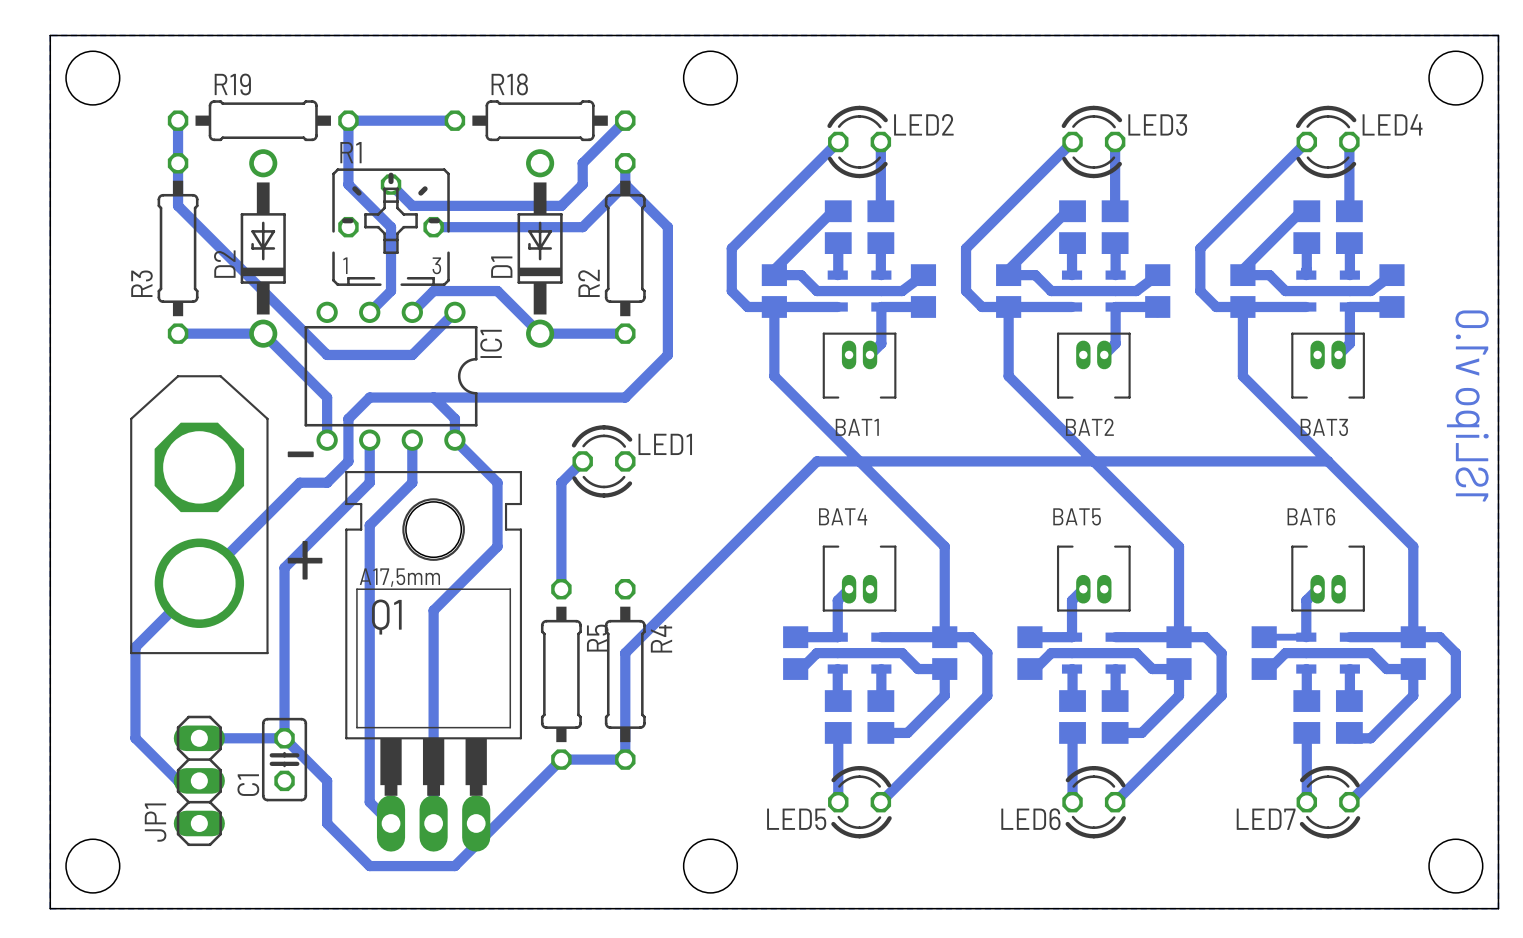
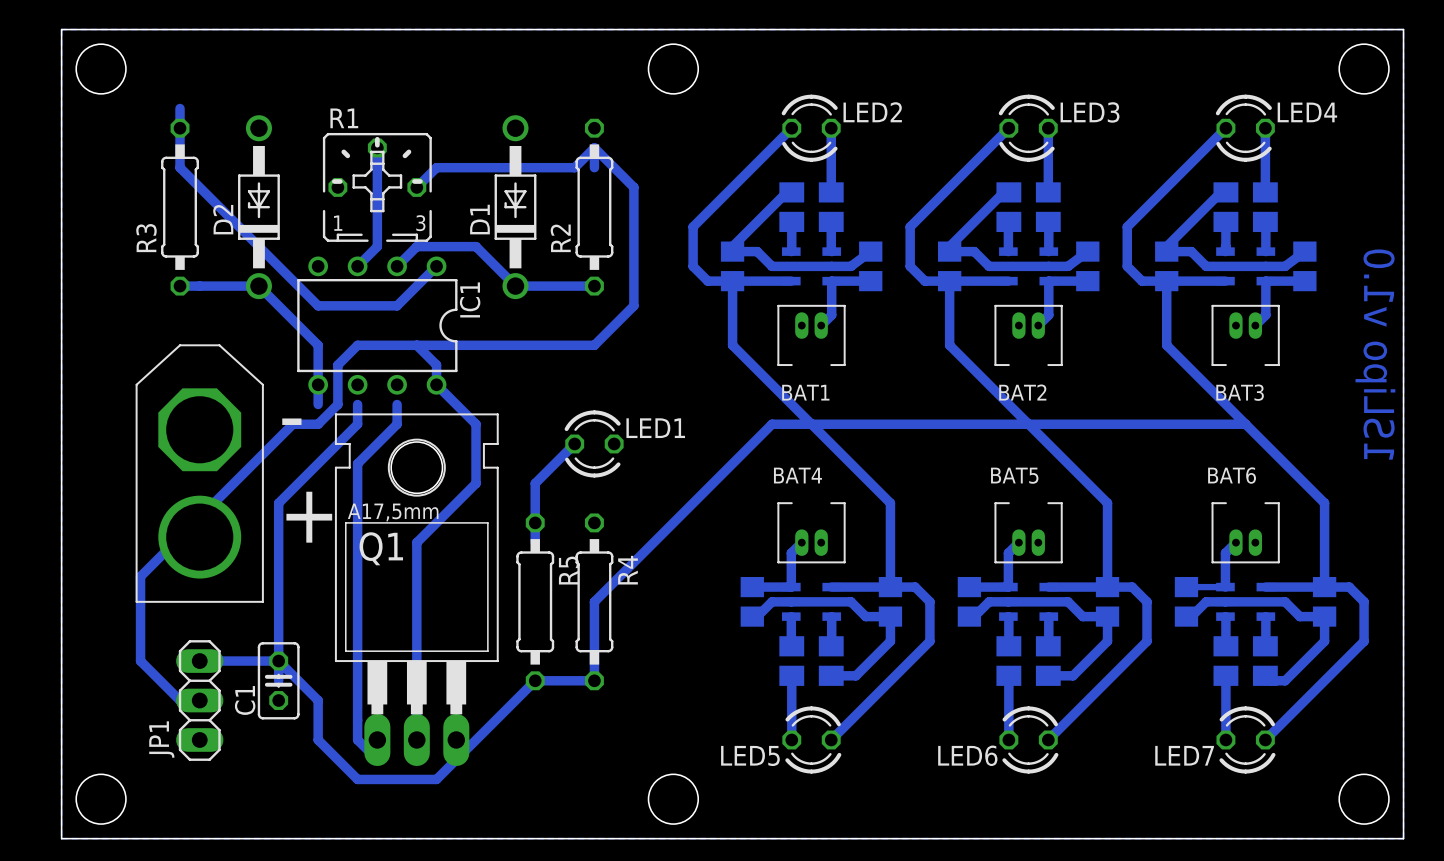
R19: (263, 120) -> none
bottom track: (454, 120) (348, 120) (348, 184) (391, 227) -> (377, 147) (377, 207)
R18: (540, 120) -> none
bottom track: (625, 120) (582, 163) (582, 184) (561, 205) (412, 205) (391, 184) -> none
bottom track: (178, 184) (178, 205) (327, 354) (412, 354) (454, 312) -> (180, 167) (318, 305) (397, 305) (436, 266)
R1 position: (391, 227) -> (377, 187)
bottom track: (433, 227) (582, 227) (625, 184) (667, 227) -> (416, 187) (436, 167) (574, 167) (594, 147) (633, 187) (633, 207)
R3 position: (178, 248) -> (180, 207)
D2 position: (263, 248) -> (258, 207)
D1 position: (540, 248) -> (515, 207)
R2 position: (625, 248) -> (594, 207)
bottom track: (391, 269) (391, 291) (369, 312) -> (377, 246) (357, 266)
bottom track: (412, 312) (433, 291) (497, 291) (540, 333) (625, 333) -> (397, 266) (416, 246) (476, 246) (515, 286) (594, 286)
bottom track: (178, 333) (263, 333) (327, 397) -> (180, 286) (258, 286) (318, 345) (318, 365)
bottom track: (667, 333) (667, 354) (625, 397) (369, 397) (348, 418) -> (633, 305) (594, 345) (357, 345) (337, 365) (337, 384)
IC1 position: (391, 376) -> (377, 325)
bottom track: (433, 397) (454, 418) (454, 440) (497, 482) -> (416, 345) (436, 365) (436, 384) (476, 424) (476, 443)
bottom track: (348, 440) (348, 461) (327, 482) (299, 482) (135, 647) -> (337, 404) (318, 424) (292, 424) (140, 576) (140, 596)
bottom track: (369, 461) (369, 482) (284, 567) -> (357, 424) (278, 503) (278, 522)
bottom track: (412, 461) (412, 482) (369, 525) -> (397, 424) (357, 463) (357, 483)
bottom track: (582, 461) (561, 482) (561, 525) -> (574, 443) (535, 483)
LED1 position: (603, 461) -> (594, 443)
bottom track: (497, 525) (497, 546) (433, 610) -> (476, 483) (416, 542) (416, 562)
Q1 position: (433, 661) -> (416, 589)
R5 position: (561, 674) -> (535, 601)
R4 position: (625, 674) -> (594, 601)
bottom track: (135, 717) (135, 738) (178, 780) (199, 780) -> (140, 661) (180, 700) (199, 700)
bottom track: (199, 738) (284, 738) (327, 780) -> (199, 661) (278, 661) (318, 700) (318, 720)
bottom track: (625, 738) (625, 759) (561, 759) (454, 866) (369, 866) (327, 823) (327, 802) -> (594, 680) (535, 680) (436, 779) (357, 779) (318, 739)
C1 position: (284, 759) -> (278, 680)
JP1 position: (199, 780) -> (199, 700)

